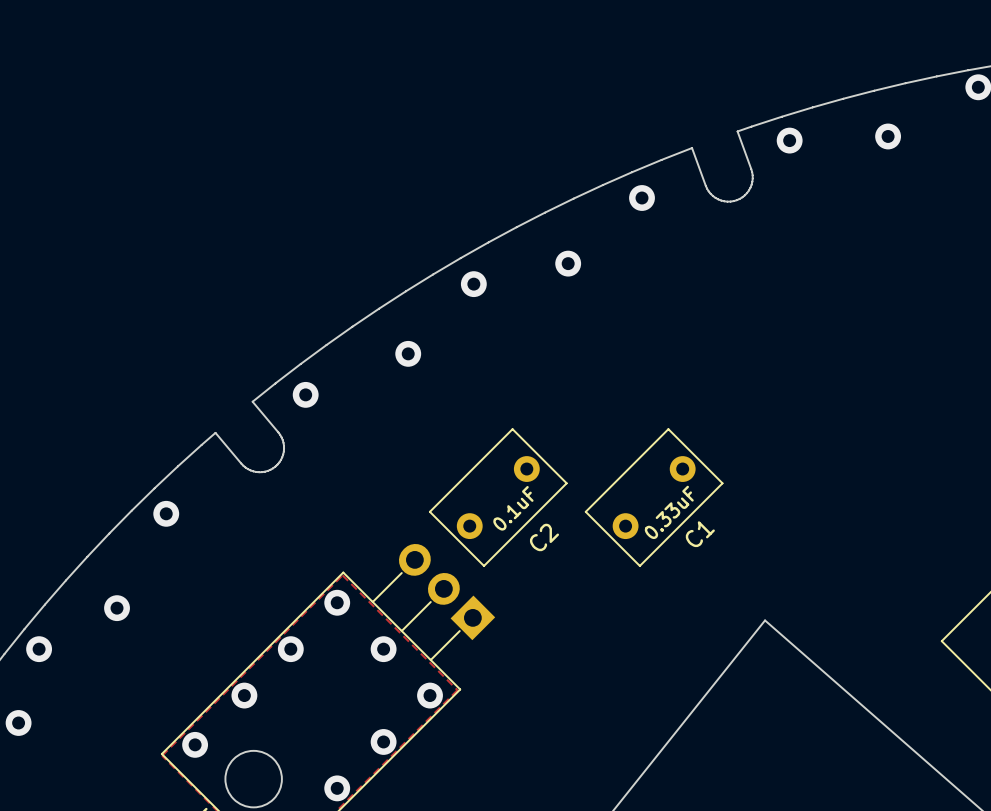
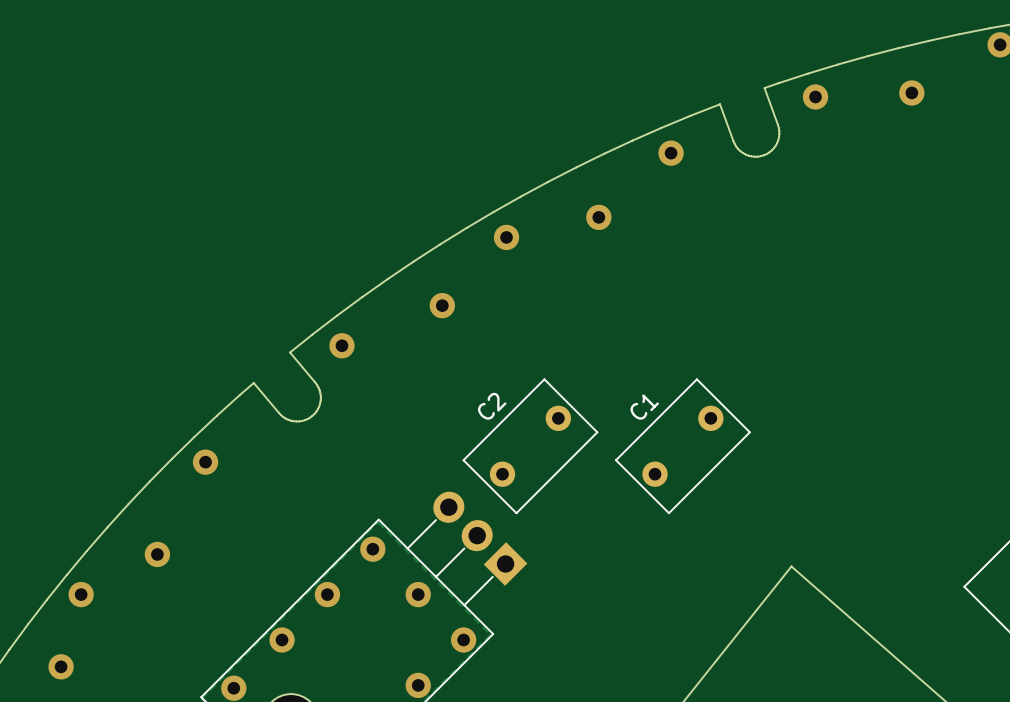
C2 value: 0.1uF (513, 508) -> none
C1 value: 0.33uF (669, 512) -> none
C1 name position: C1 (700, 534) -> C1 (644, 407)
C2 name position: C2 (544, 537) -> C2 (492, 406)

